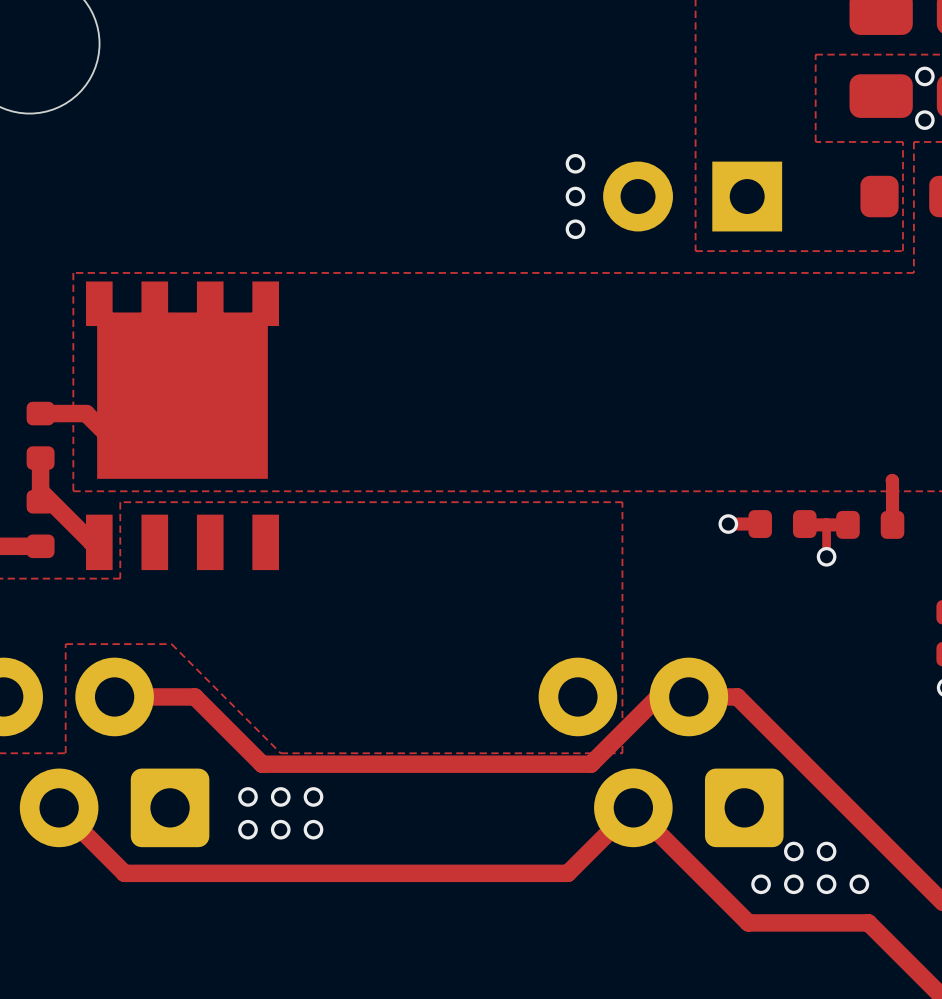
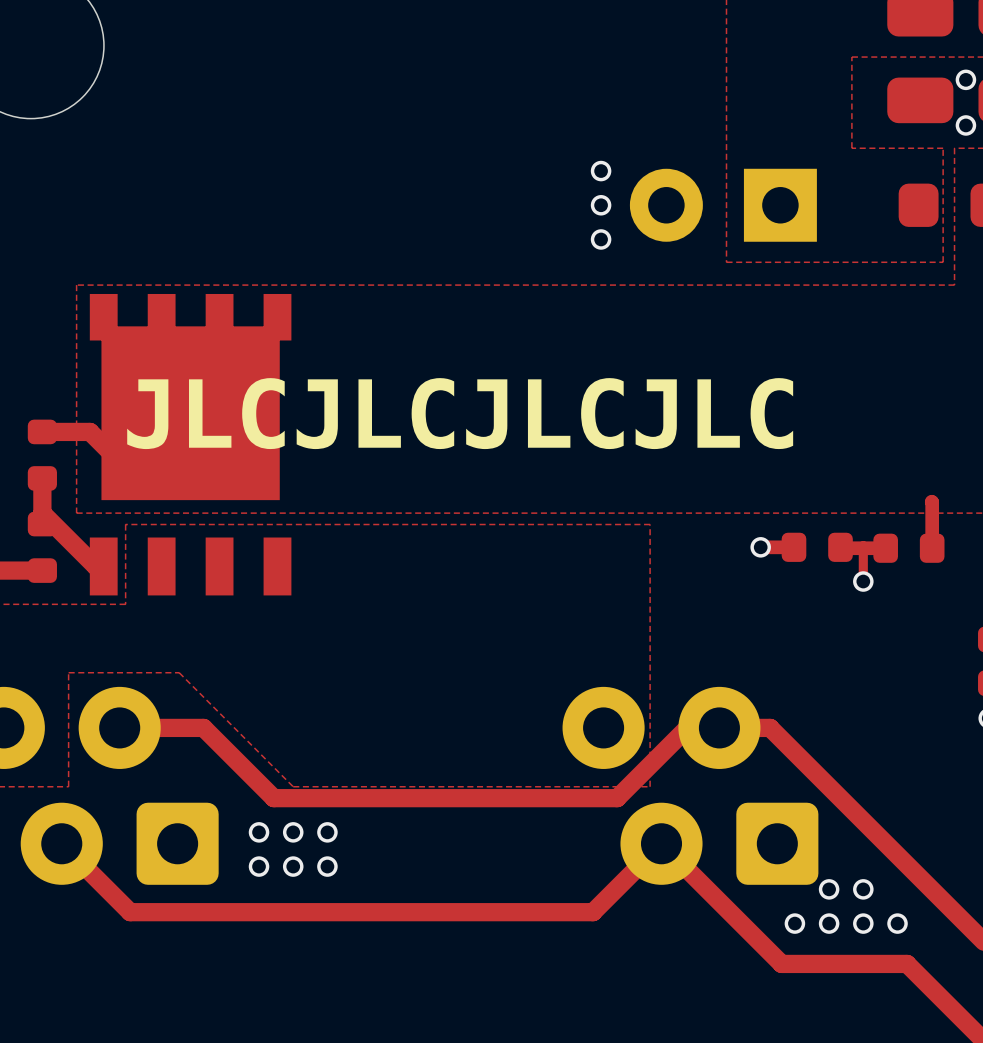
text: none -> JLCJLCJLCJLC (460, 413)

